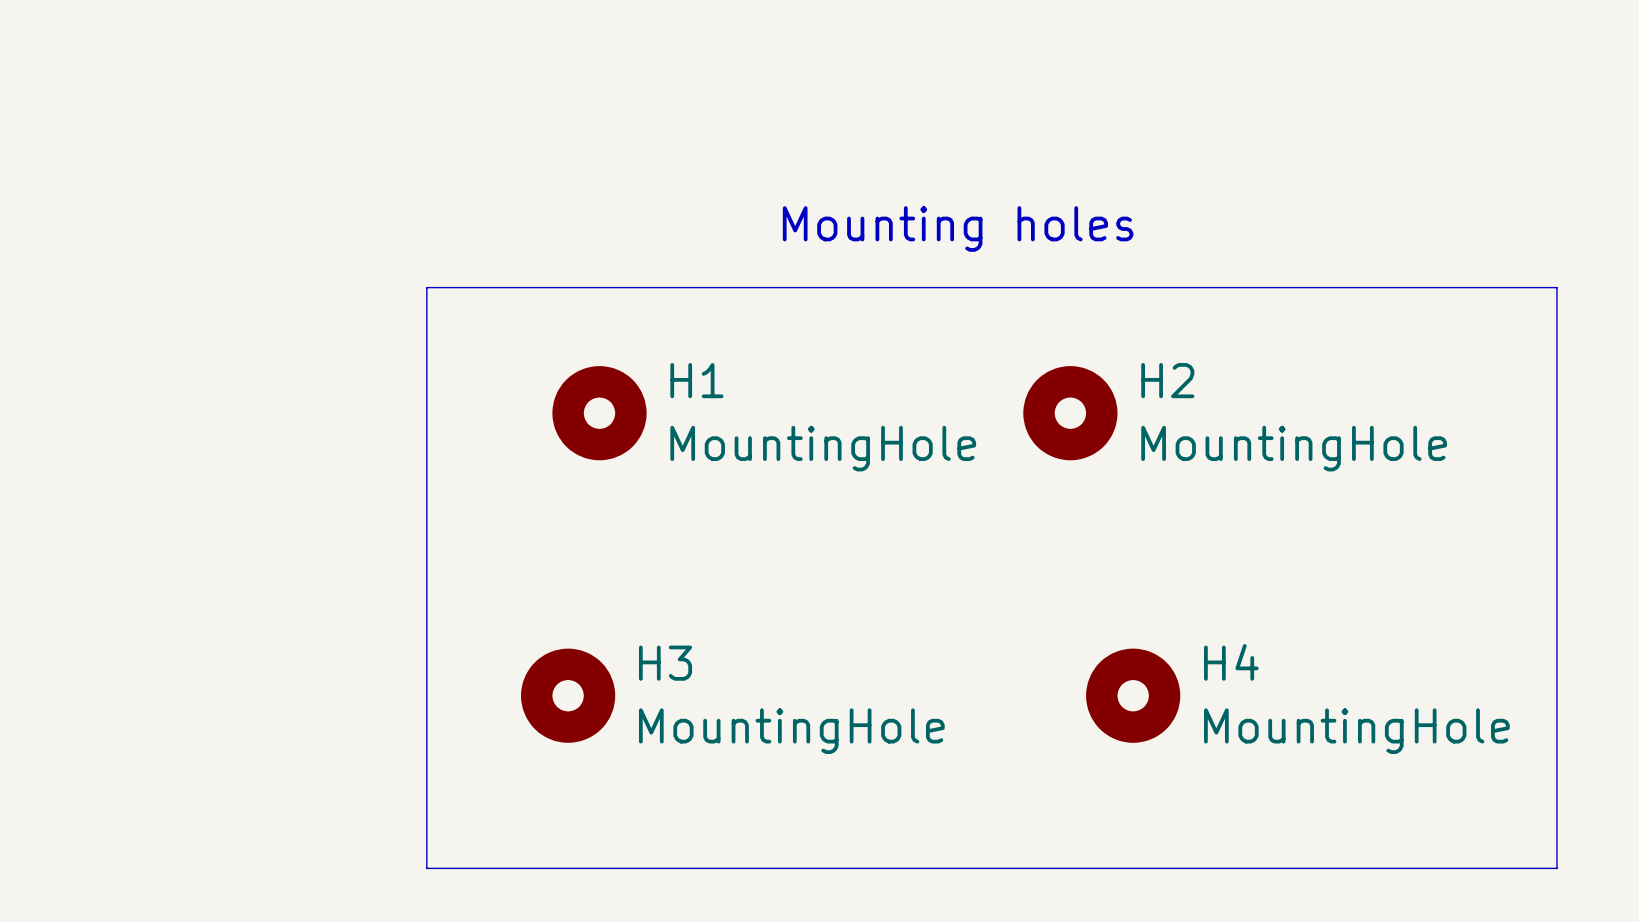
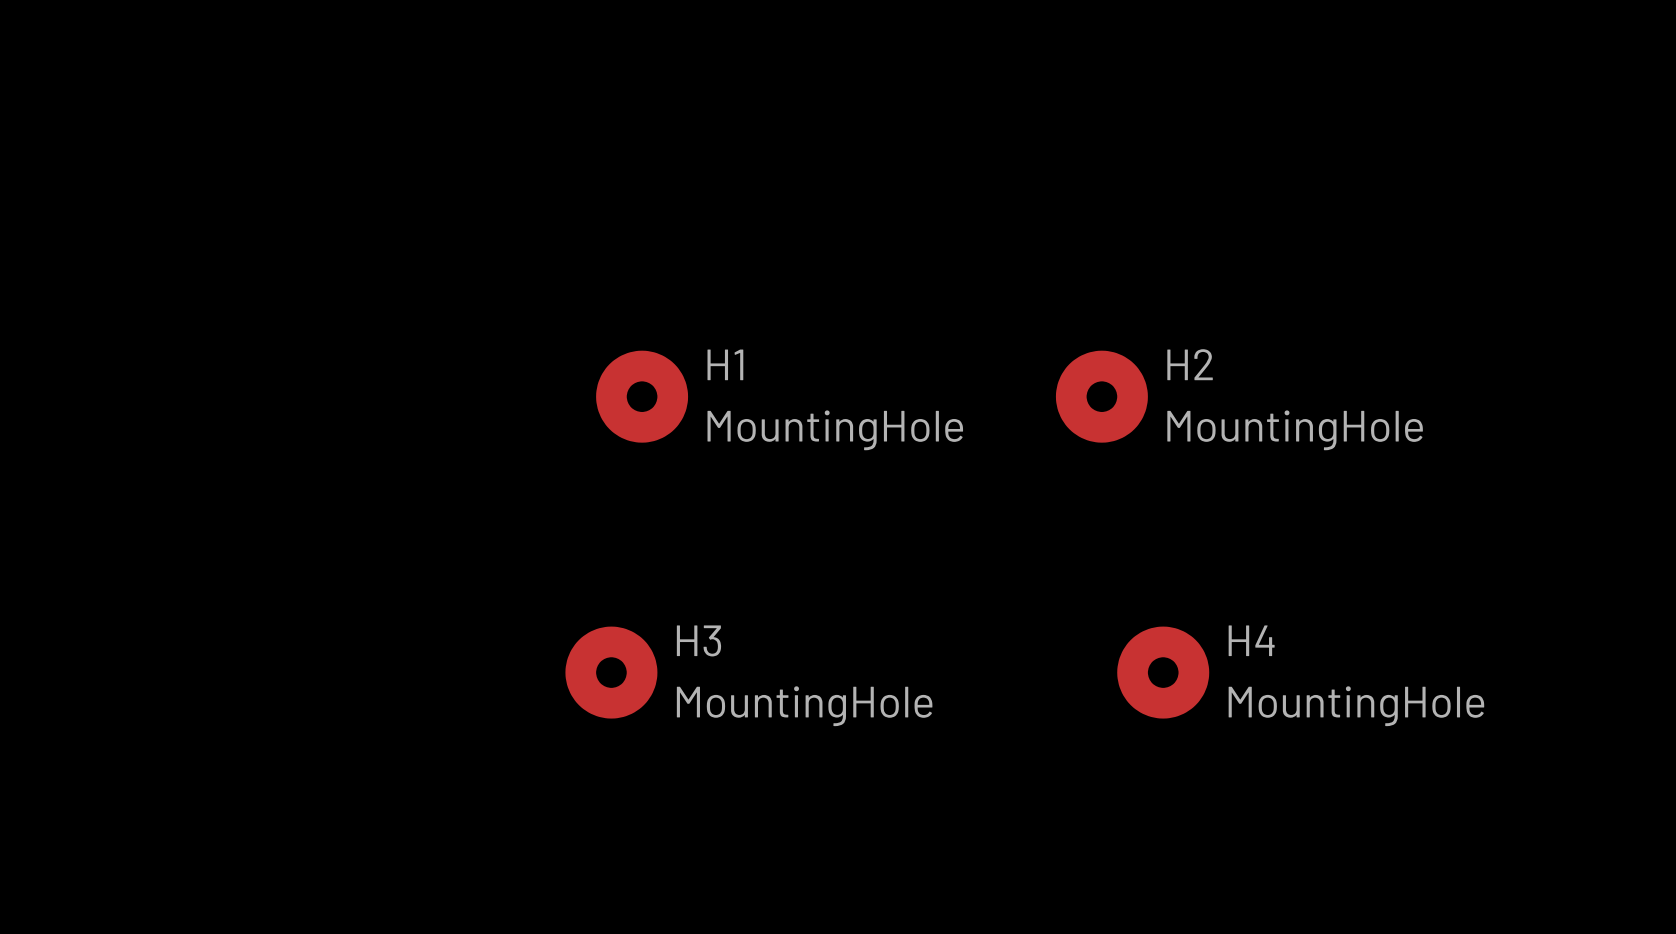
text: Mounting holes (958, 228) -> none
line: (426, 287) (1556, 287) (1556, 868) (426, 868) (426, 287) -> none

